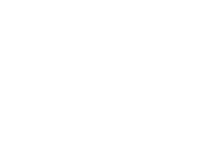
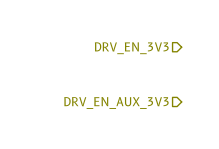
hierarchical label: none -> DRV_EN_3V3 (131, 48)
hierarchical label: none -> DRV_EN_AUX_3V3 (116, 102)

